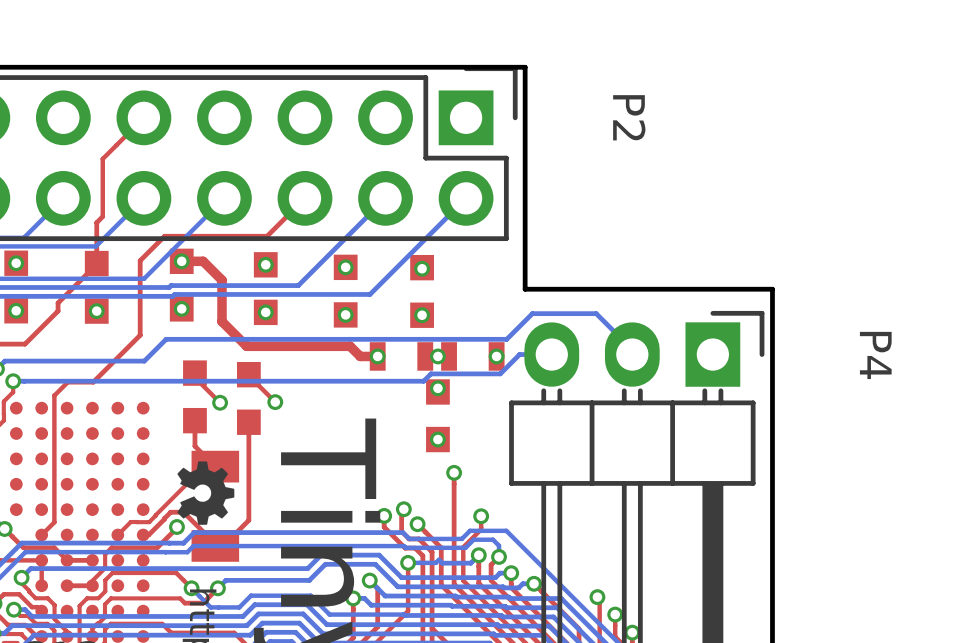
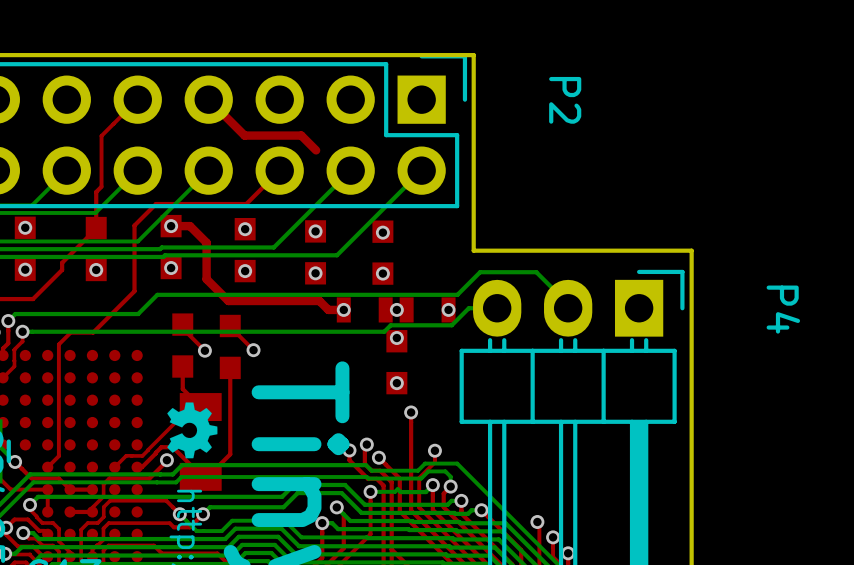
top track: none -> (208, 99) (244, 135) (301, 135) (316, 150)

